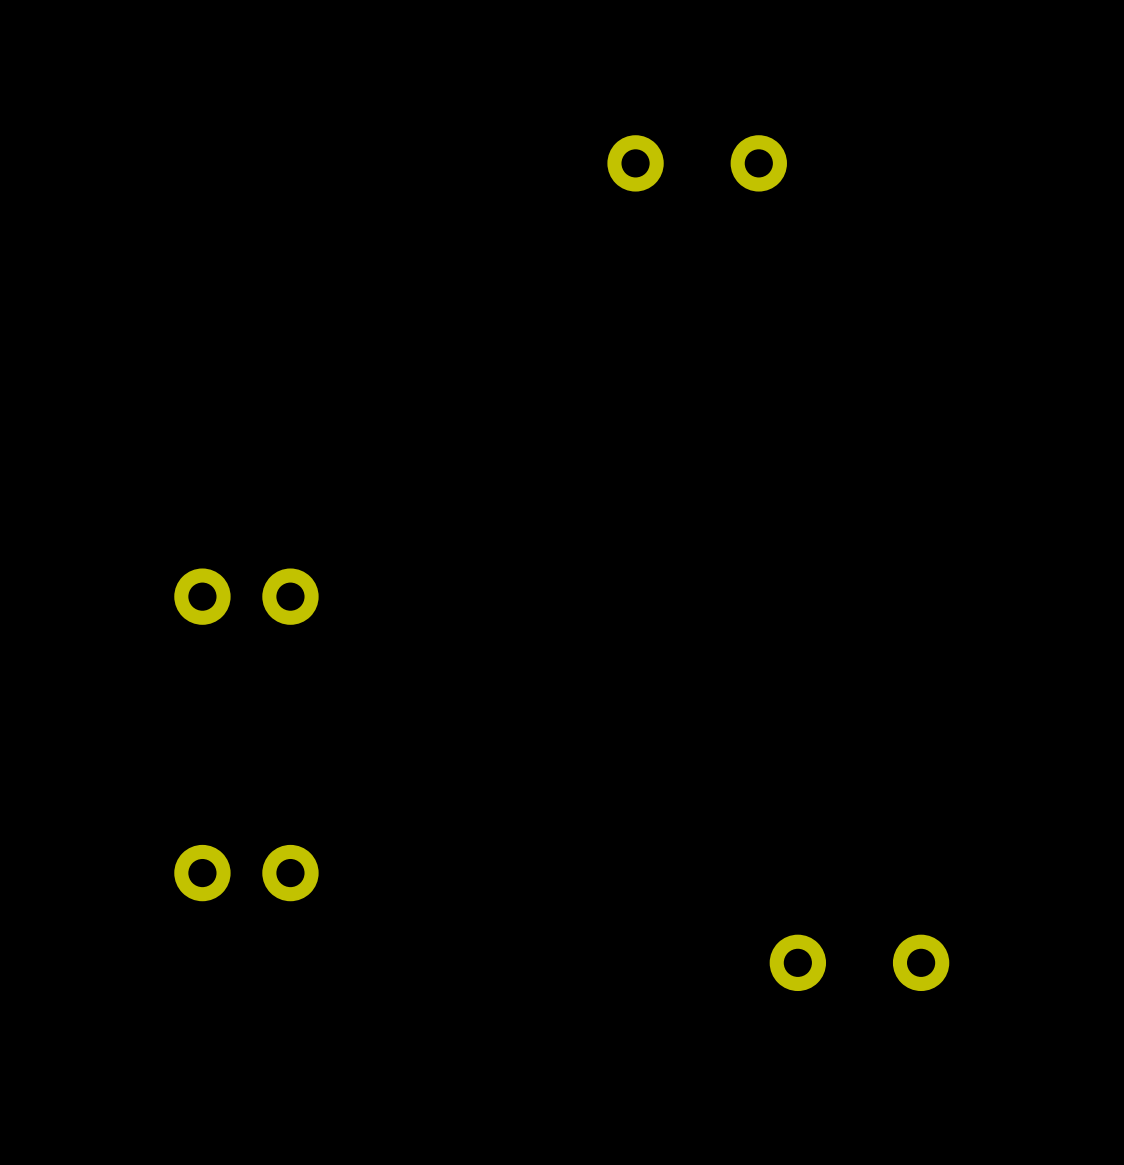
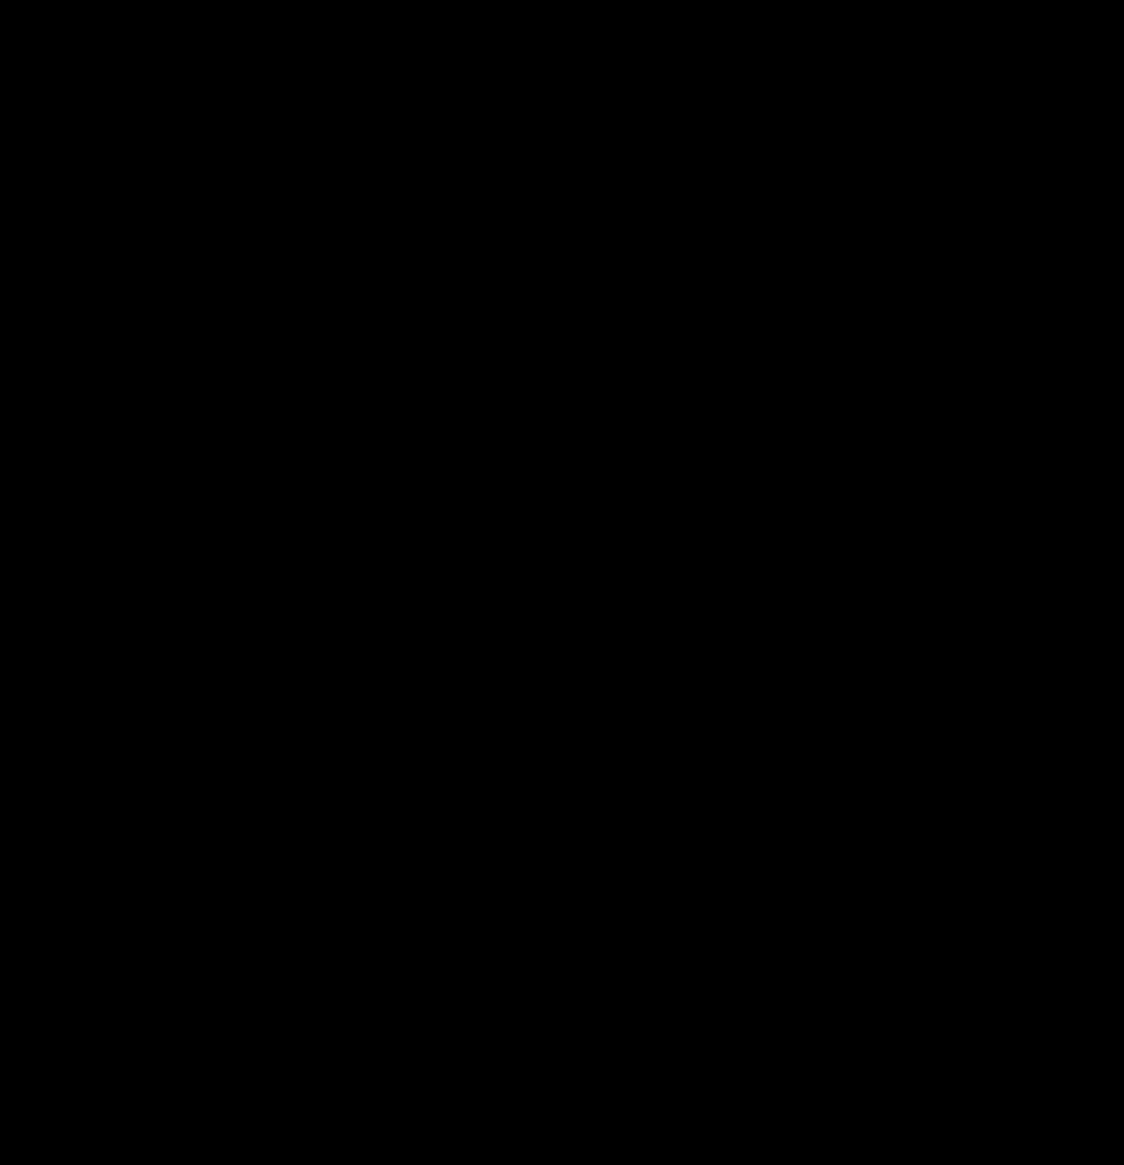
part: (697, 163) -> none
part: (246, 596) -> none
part: (246, 873) -> none
part: (859, 962) -> none

